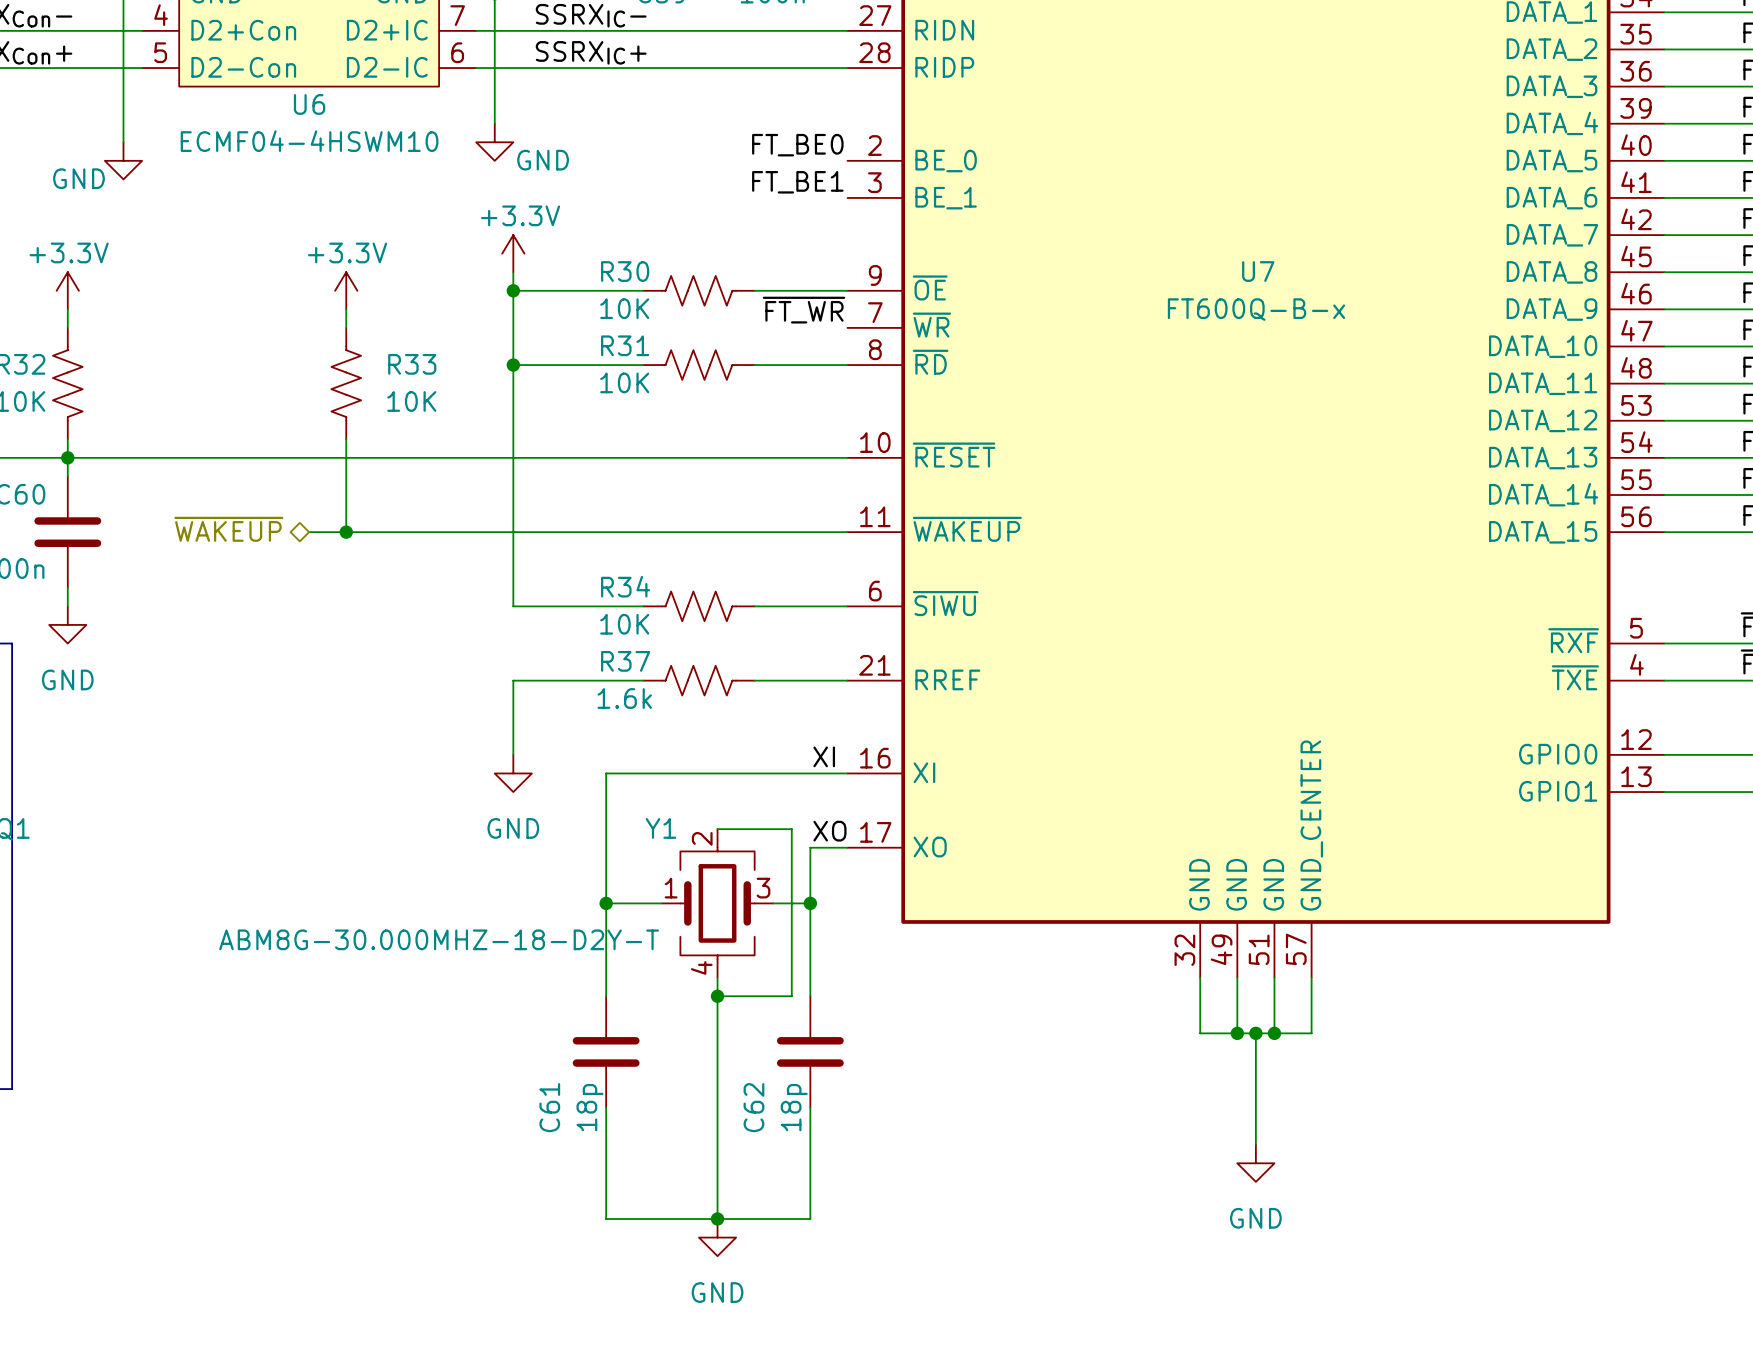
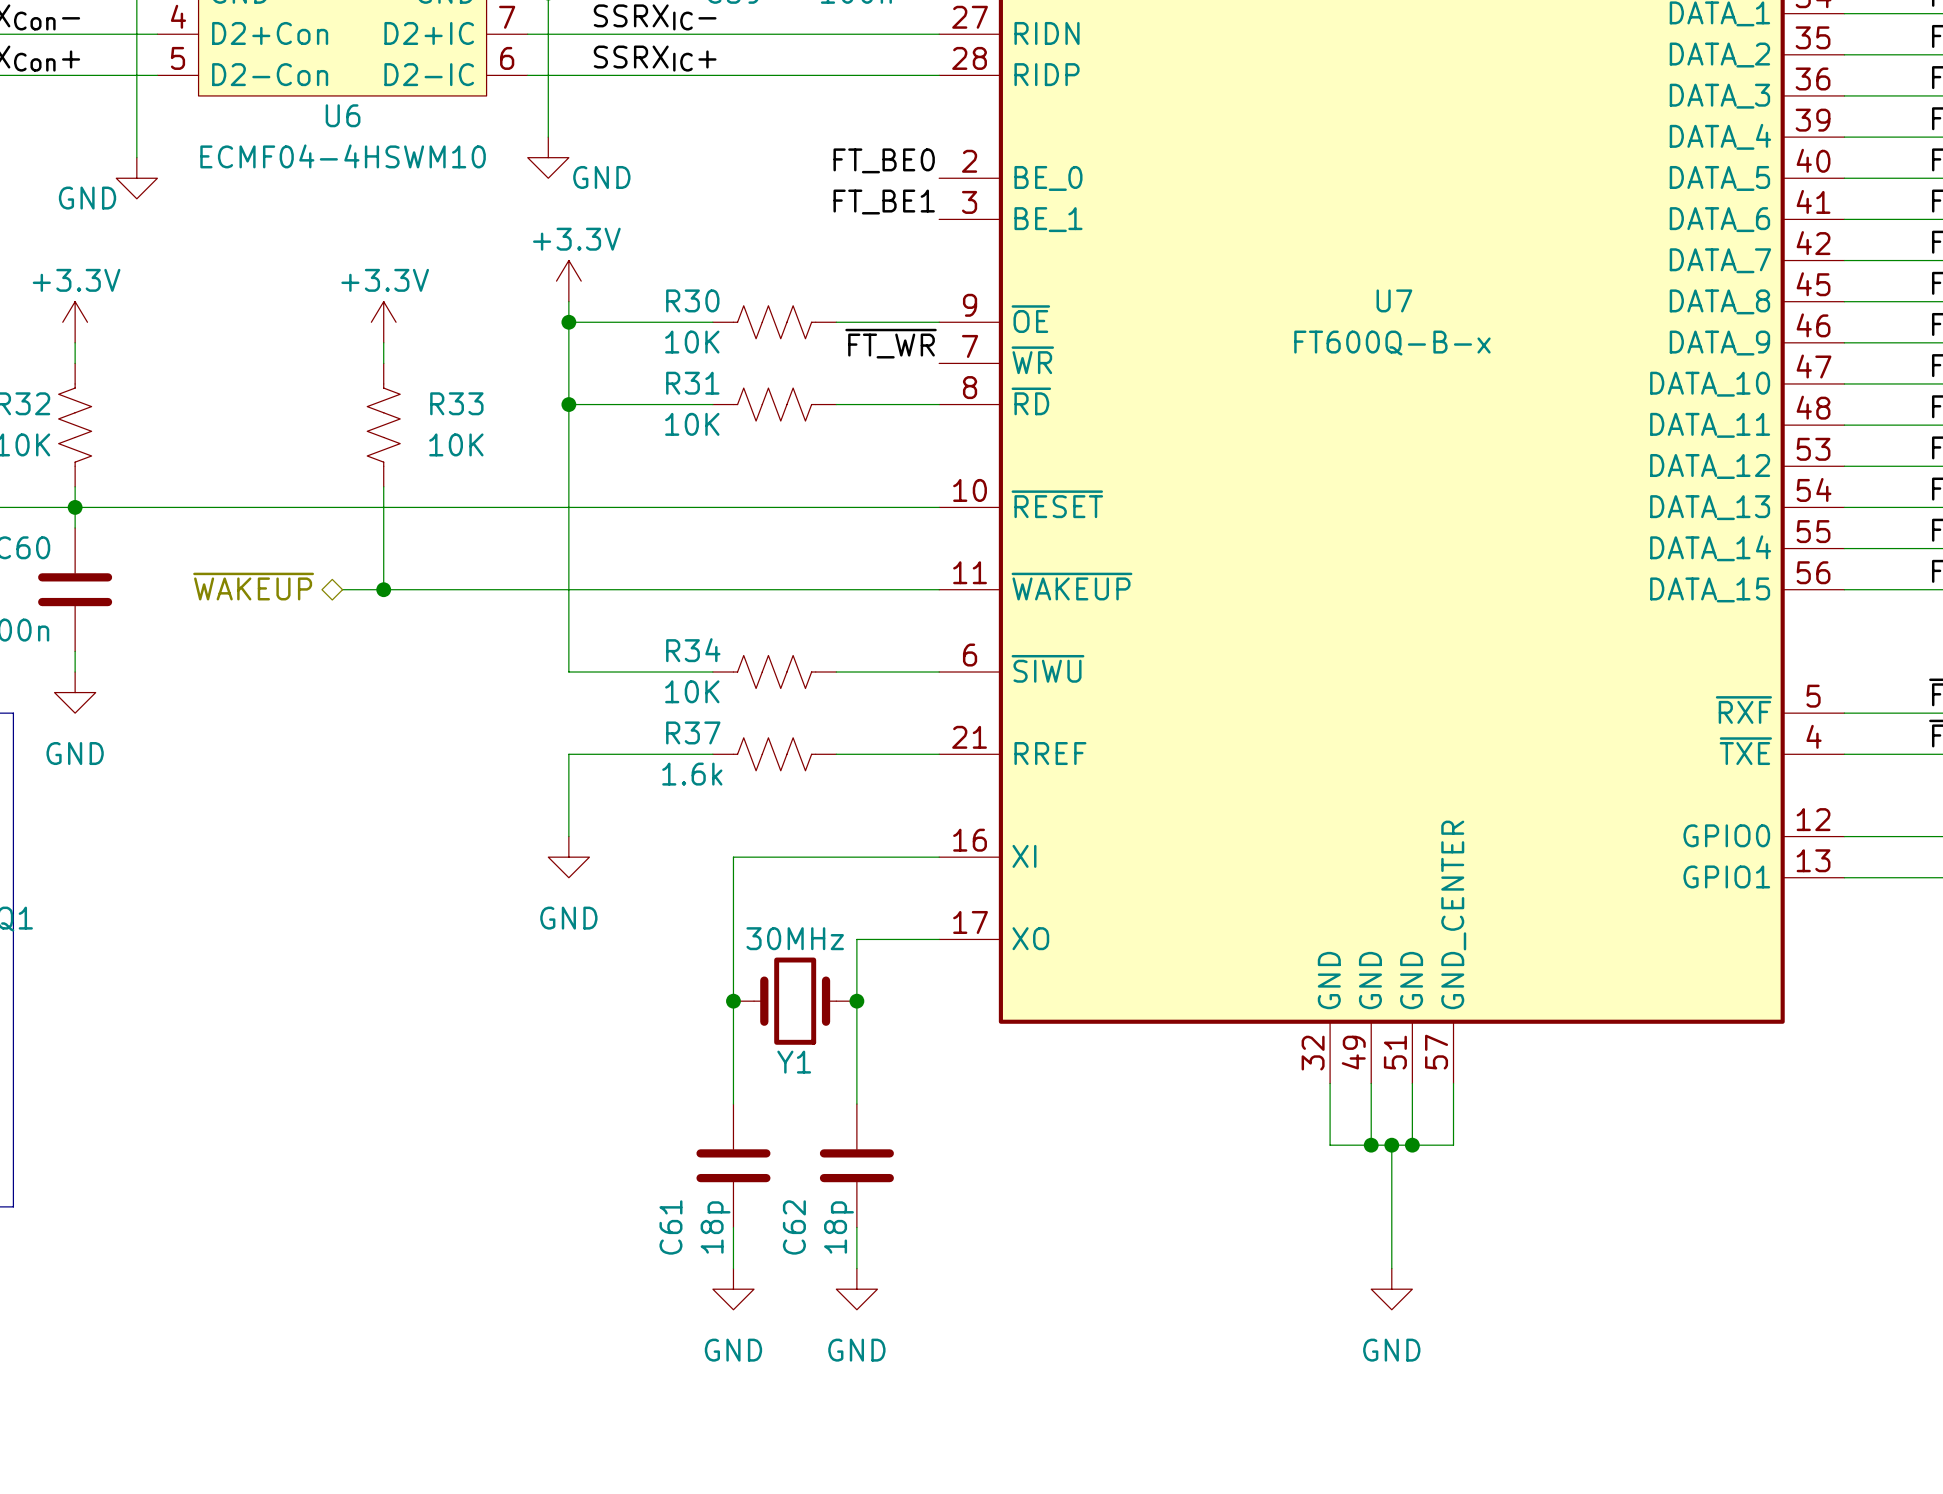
label: XI (824, 756) -> none
wire: (661, 773) (606, 773) (606, 996) -> (733, 857) (733, 1104)
Y1 name position: Y1 (660, 828) -> Y1 (794, 1062)
Y1 symbol: [661, 829, 774, 978] -> [733, 957, 857, 1045]
wire: (717, 829) (791, 829) (791, 996) (717, 996) -> none
label: XO (829, 831) -> none
wire: (810, 847) (810, 996) -> (898, 939) (856, 939) (856, 1104)
wire: (606, 903) (661, 903) -> none
junction: (606, 903) -> none
junction: none -> (733, 1001)
wire: (773, 903) (810, 903) -> none
junction position: (810, 903) -> (856, 1001)
Y1 value: ABM8G-30.000MHZ-18-D2Y-T (439, 939) -> 30MHz (795, 938)
wire: (717, 977) (717, 1219) -> none
junction: (717, 996) -> none
C61 position: (606, 1051) -> (733, 1165)
C62 position: (810, 1051) -> (856, 1165)
wire: (606, 1107) (606, 1219) (810, 1219) (810, 1107) -> none
wire: none -> (733, 1227) (733, 1268)
wire: none -> (856, 1227) (856, 1268)
power symbol: none -> GND (733, 1289)
power symbol: none -> GND (856, 1289)
junction: (717, 1219) -> none
power symbol: GND (717, 1237) -> none

